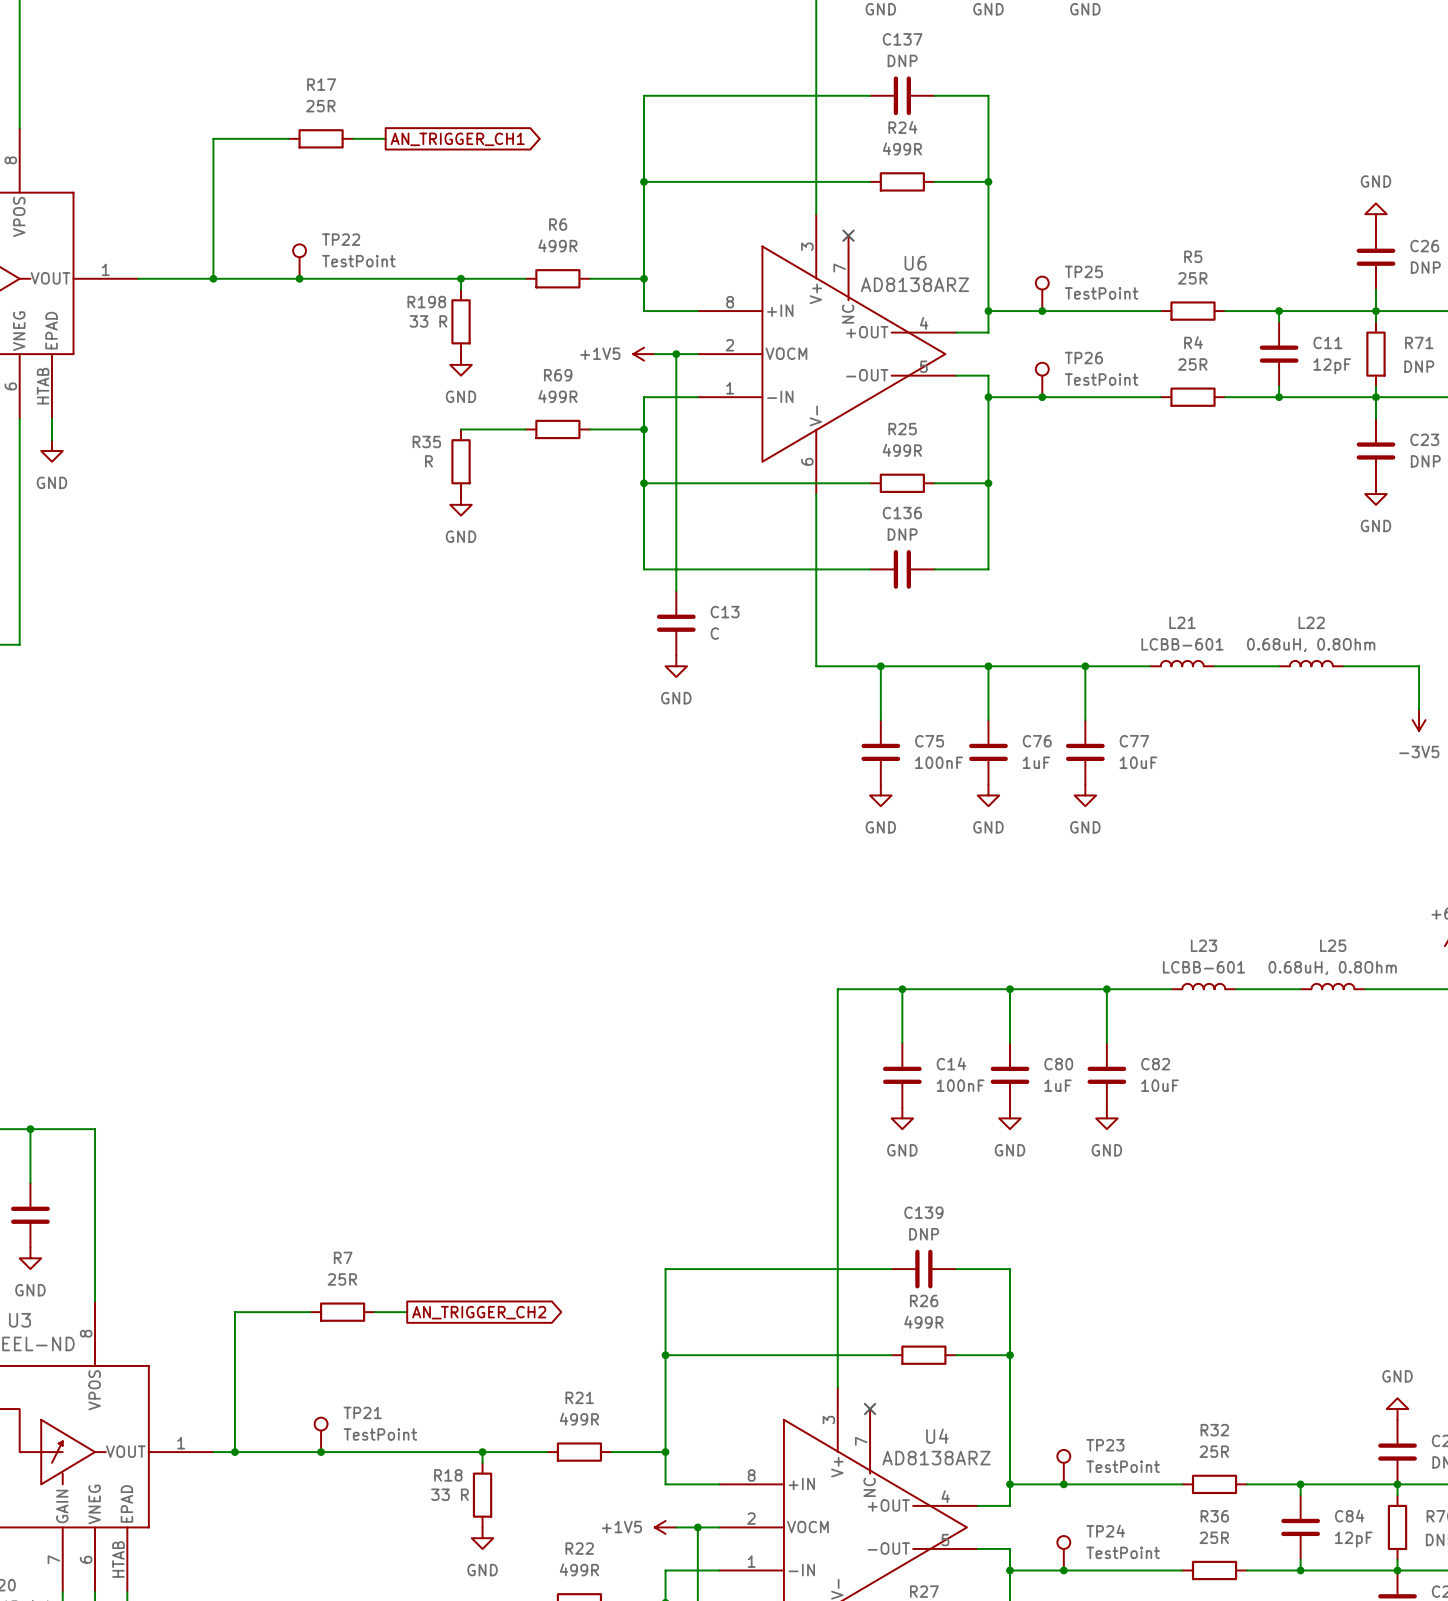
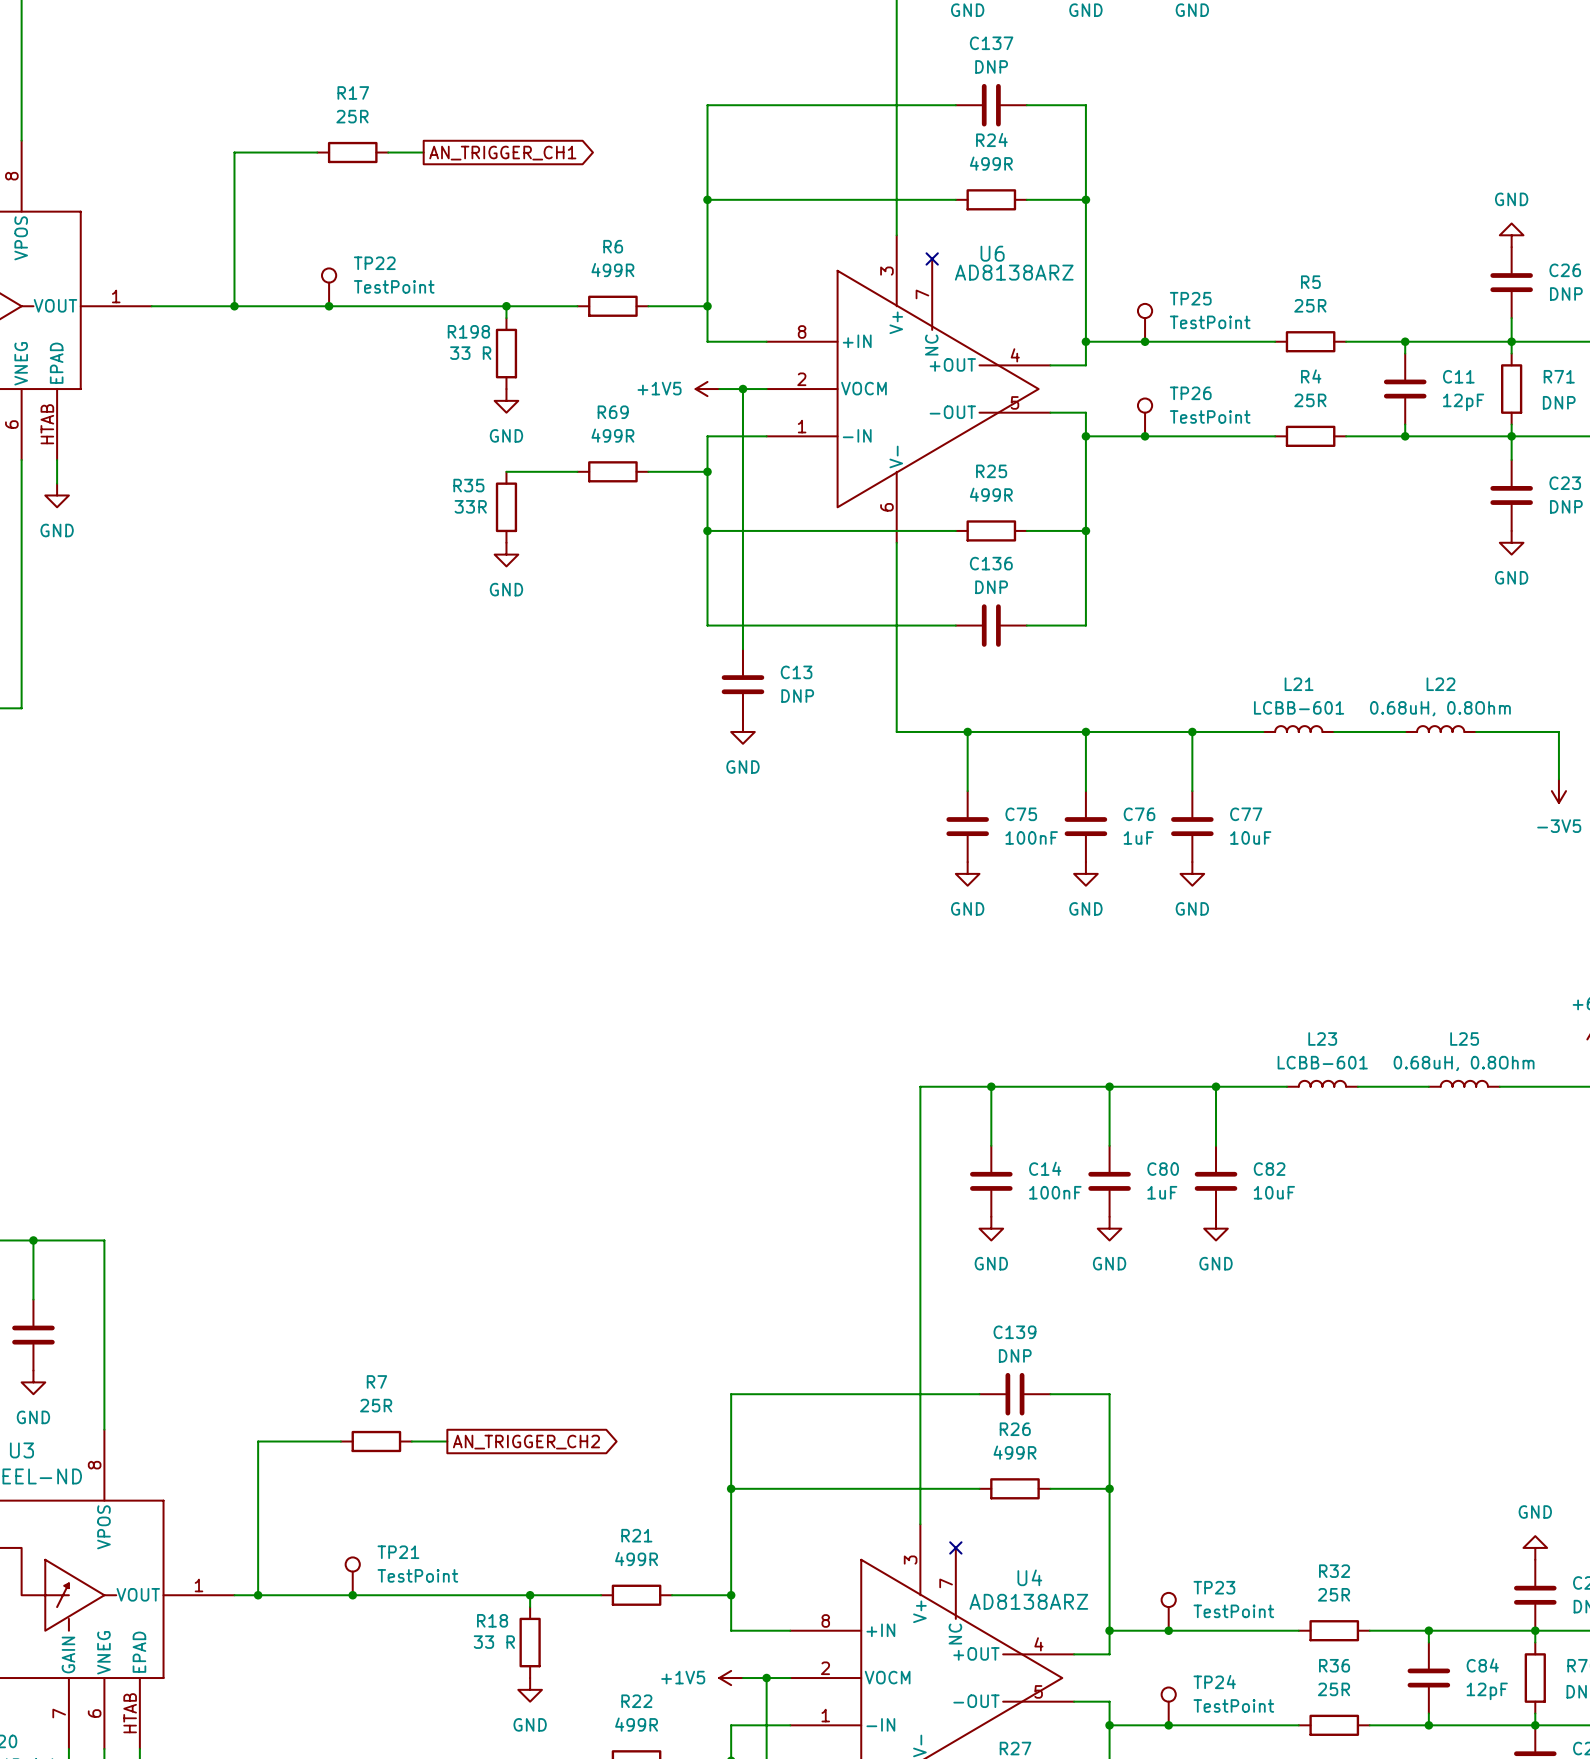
U6 name position: U6 (915, 263) -> U6 (992, 253)
U6 value position: AD8138ARZ (914, 284) -> AD8138ARZ (1014, 272)
R35 value: R (428, 461) -> 33R (470, 506)
C13 value: C (714, 633) -> DNP (797, 696)

